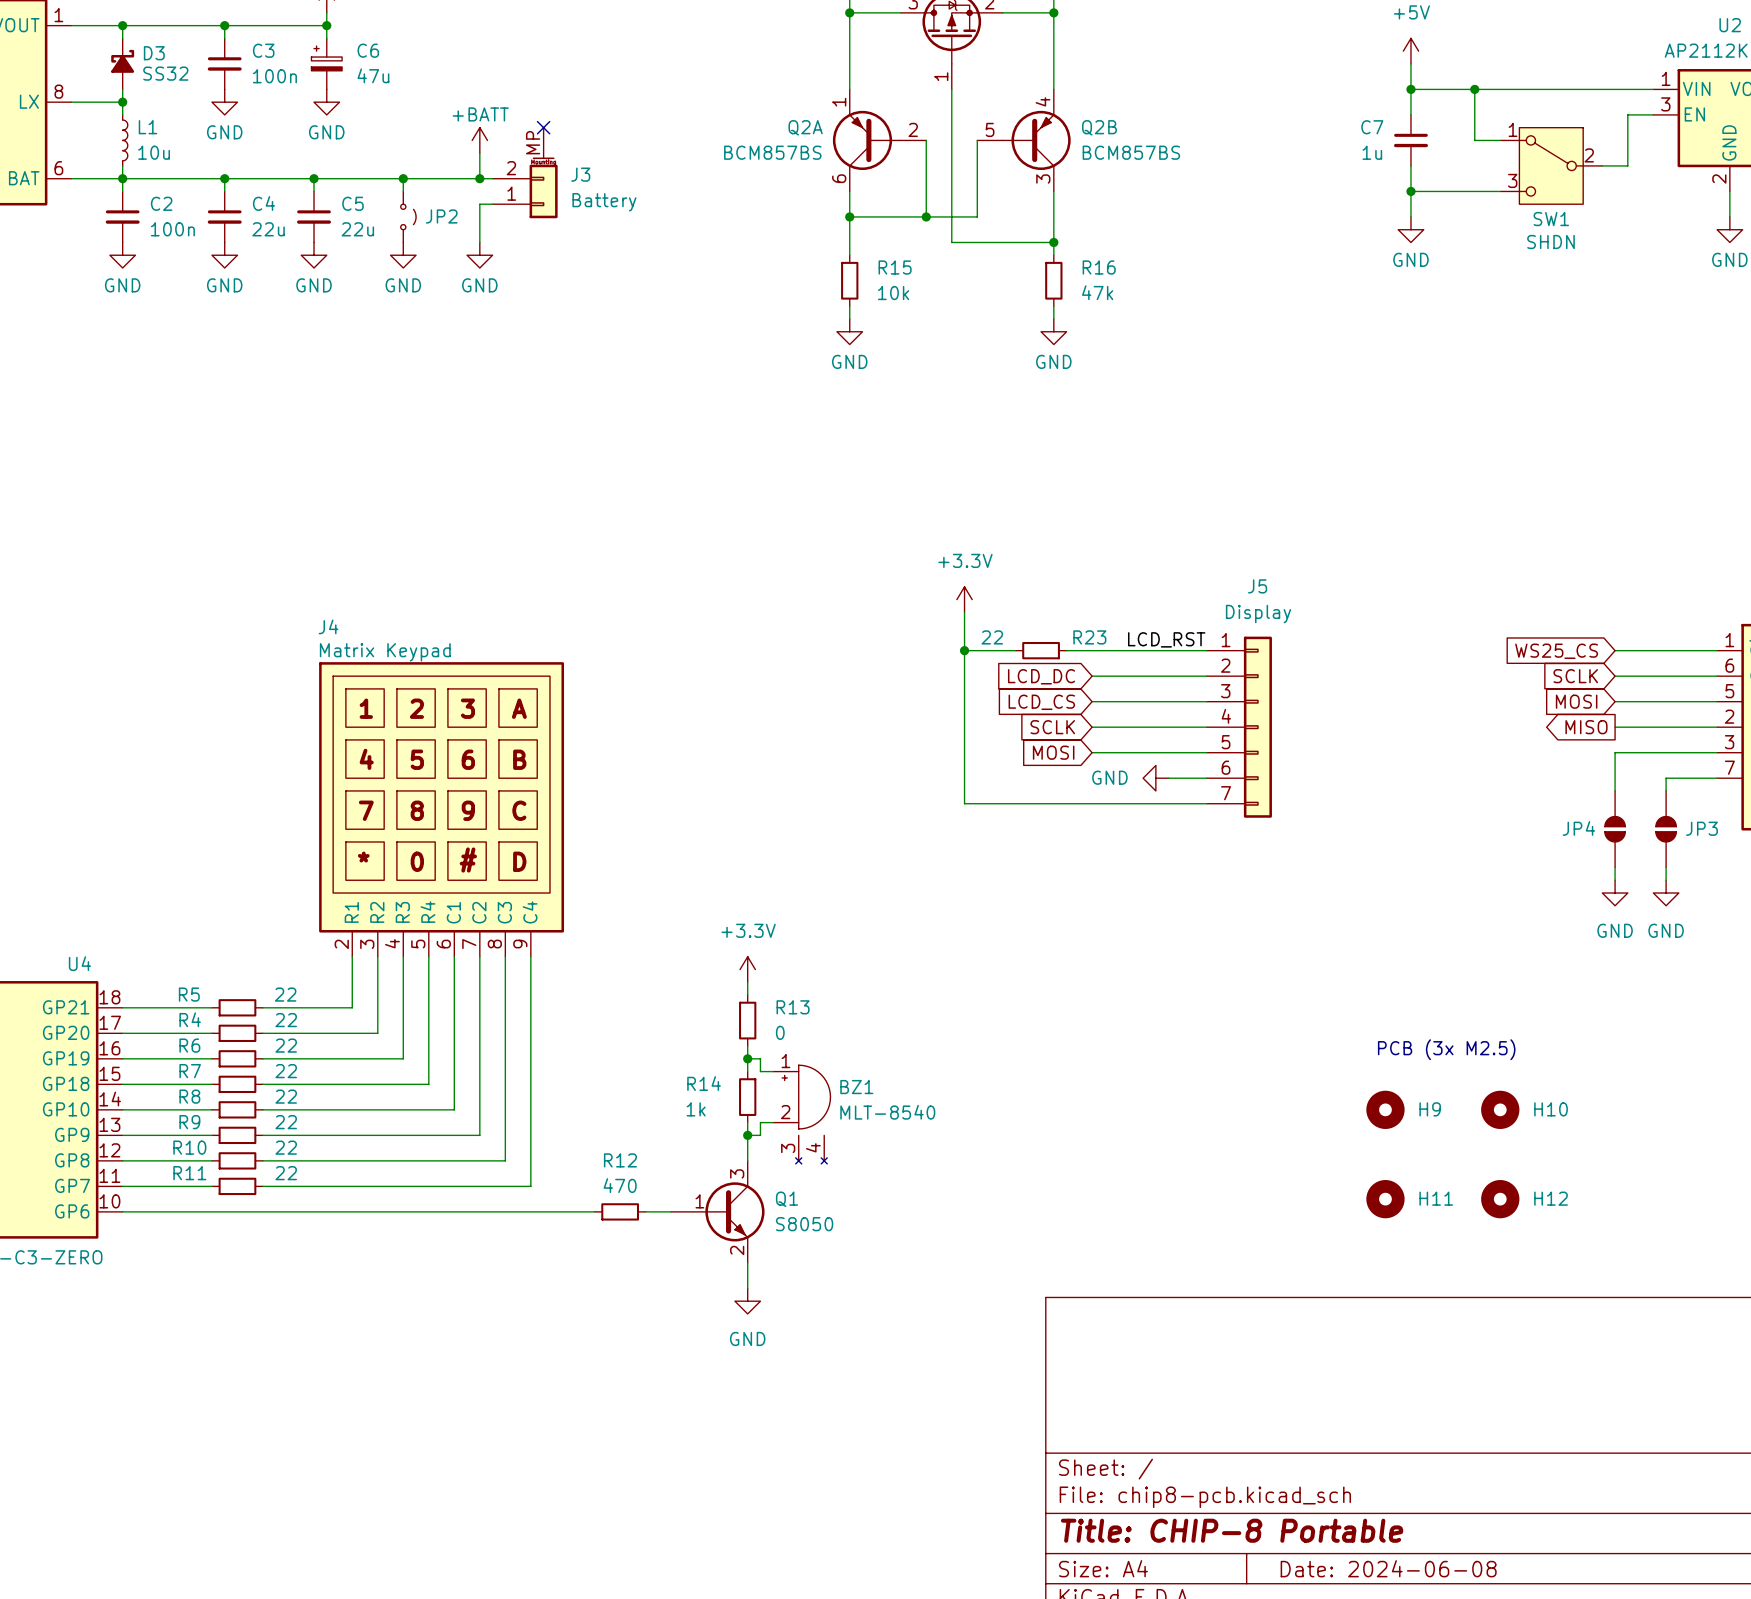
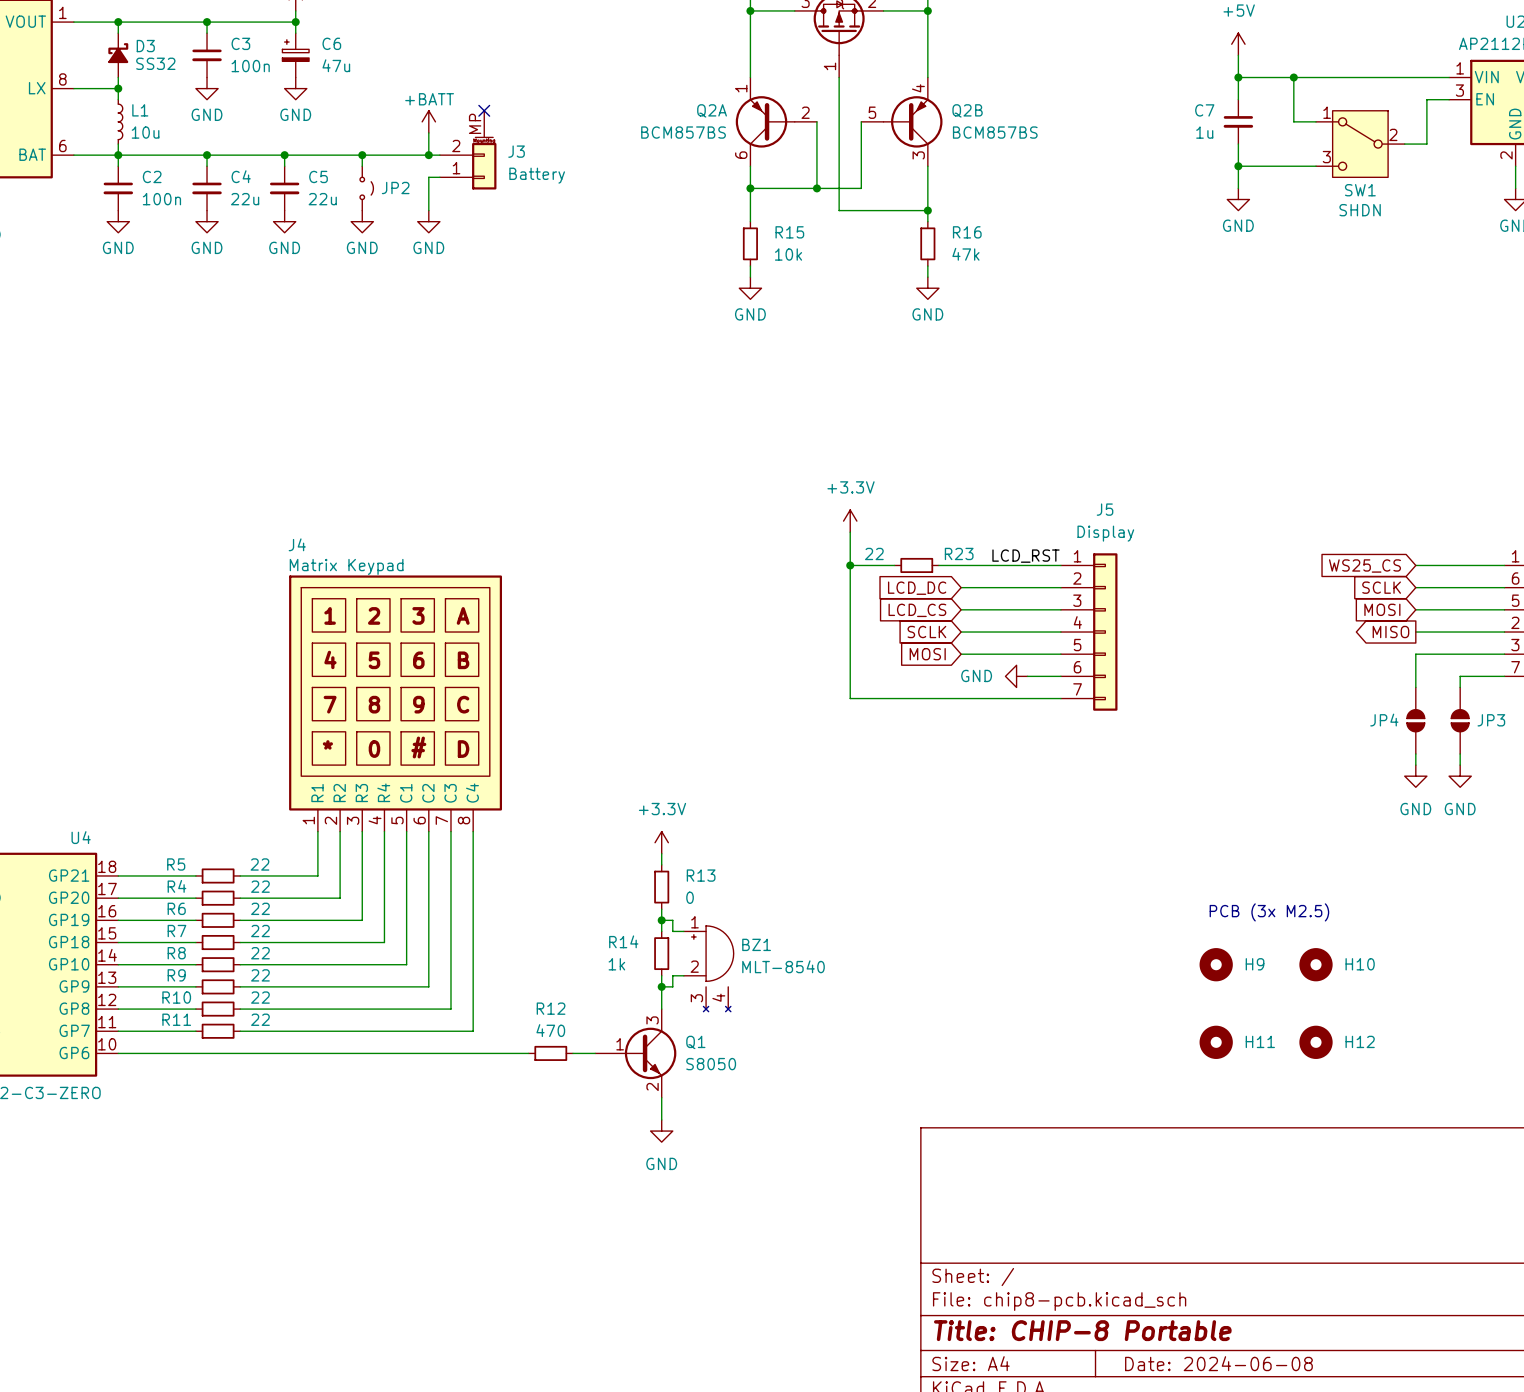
J4 pin number: 4 (392, 943) -> 3 (353, 820)
J4 pin number: 2 (341, 944) -> 1 (308, 820)
J4 pin number: 3 (367, 944) -> 2 (330, 820)
J4 pin number: 5 (418, 944) -> 4 (375, 820)
J4 pin number: 6 (443, 944) -> 5 (397, 820)
J4 pin number: 7 (469, 944) -> 6 (419, 820)
J4 pin number: 8 (494, 944) -> 7 (441, 820)
J4 pin number: 9 (520, 944) -> 8 (464, 820)

